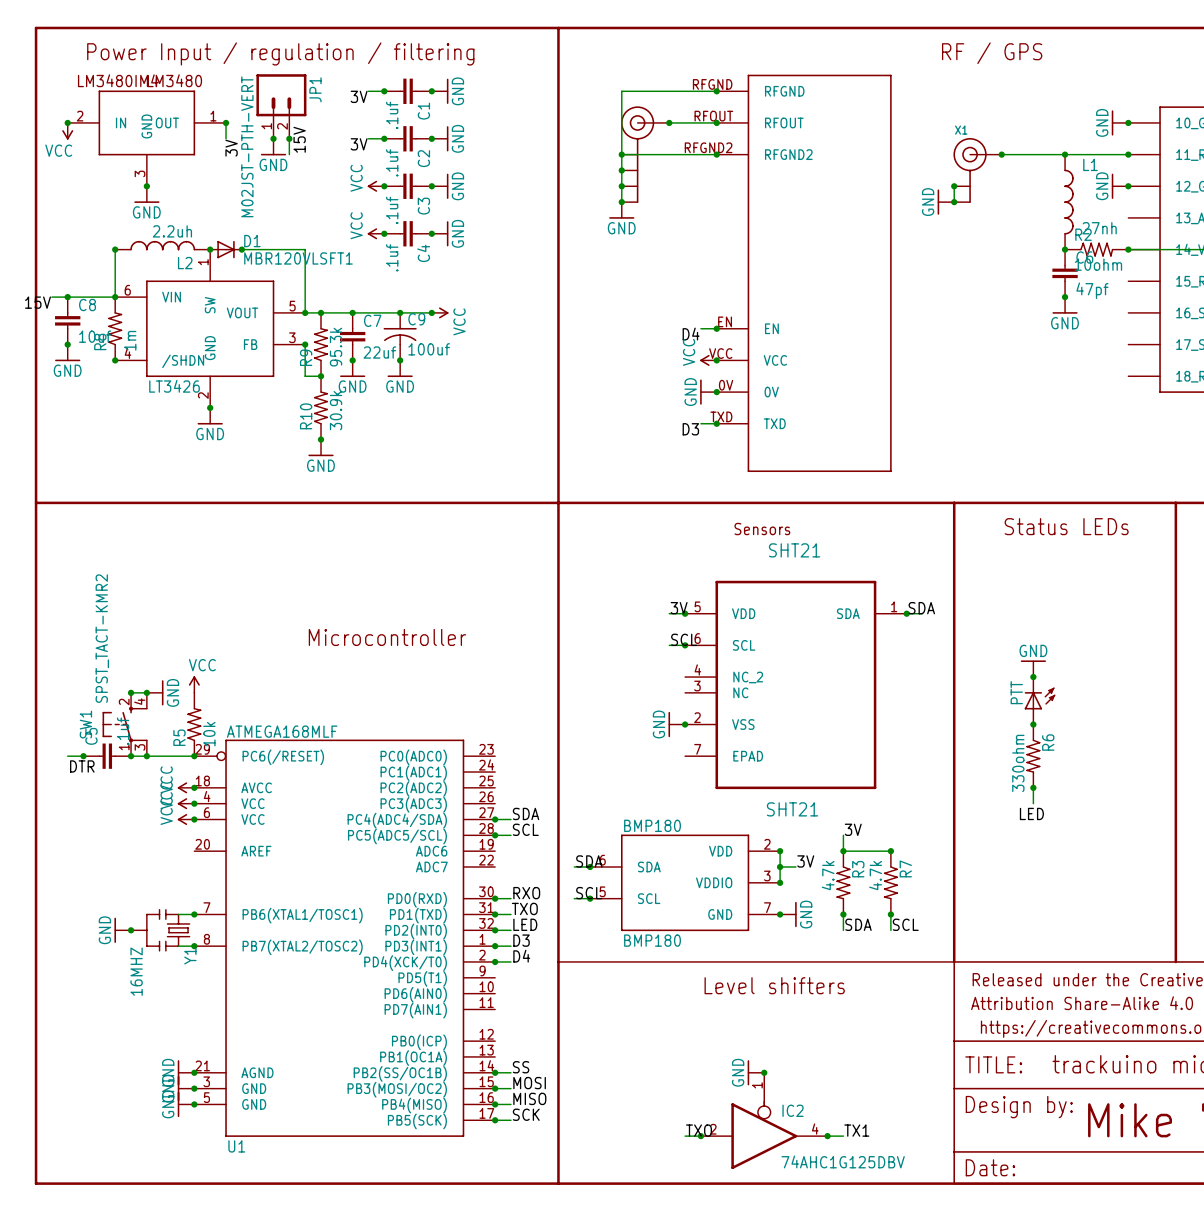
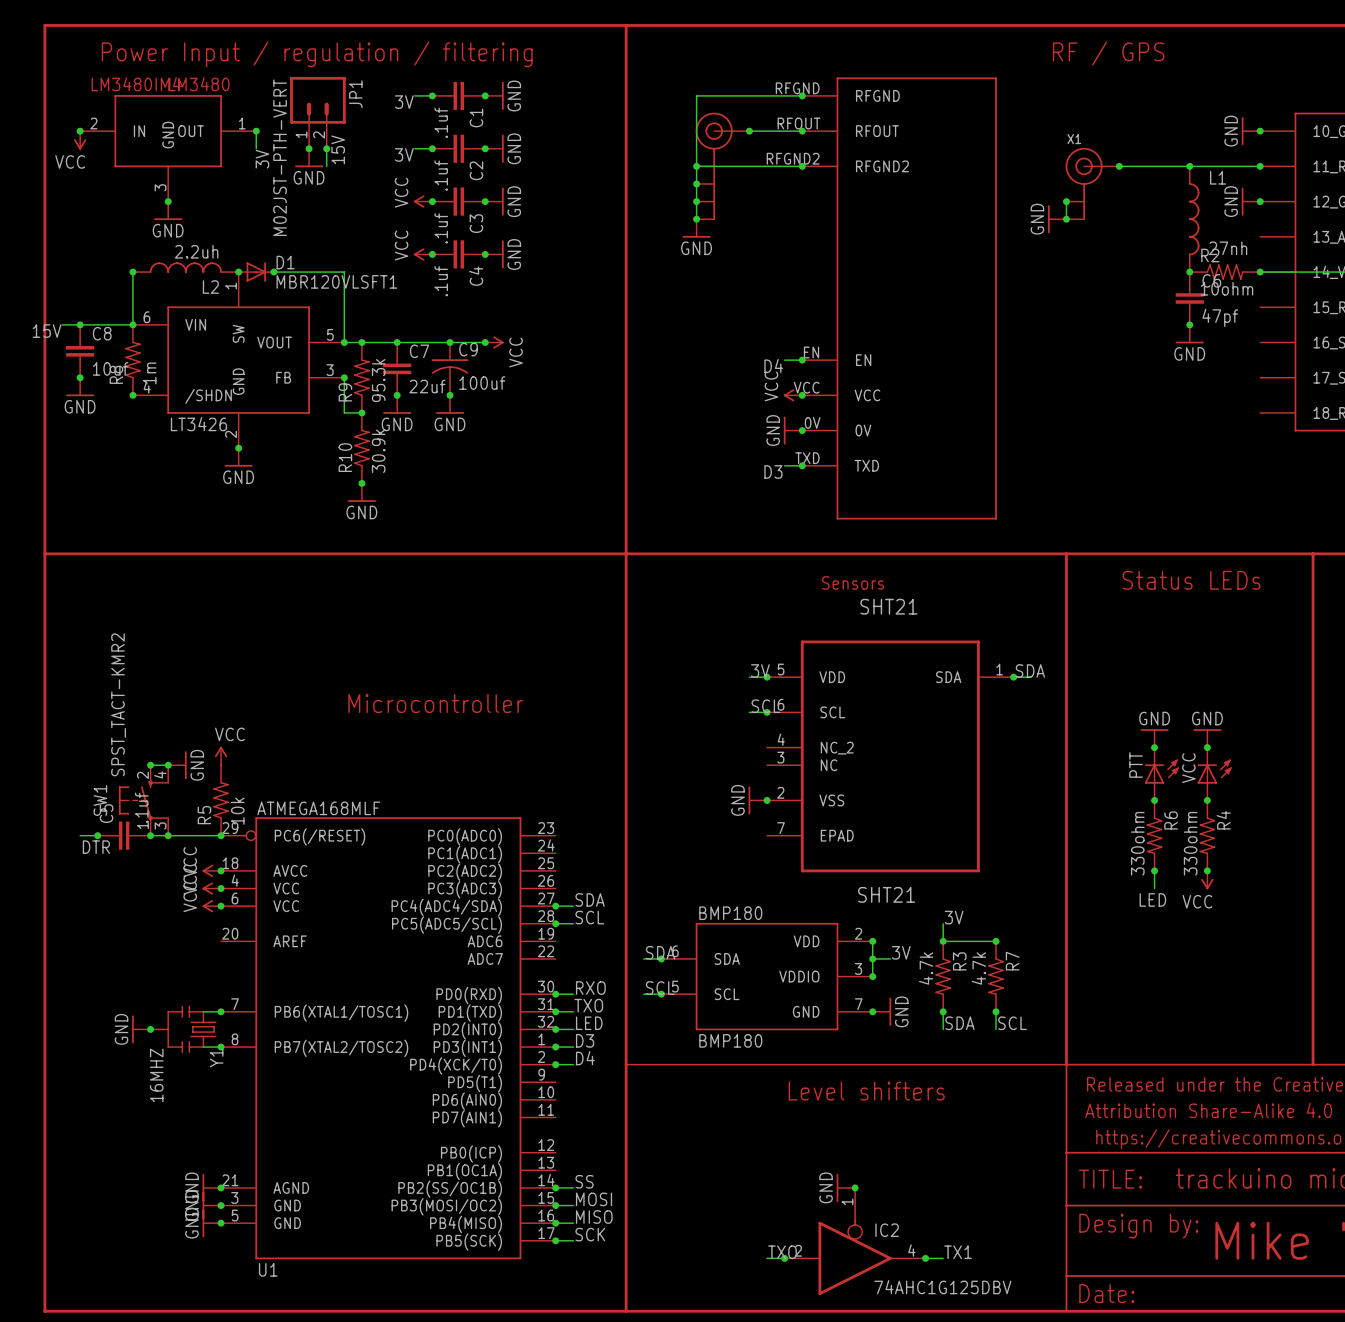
power symbol: none -> GND (1207, 738)
junction: none -> (1207, 747)
VCC: none -> (1214, 774)
junction: none -> (1207, 800)
R4: none -> 330ohm (1207, 835)
junction: none -> (1207, 870)
power symbol: none -> VCC (1207, 880)

